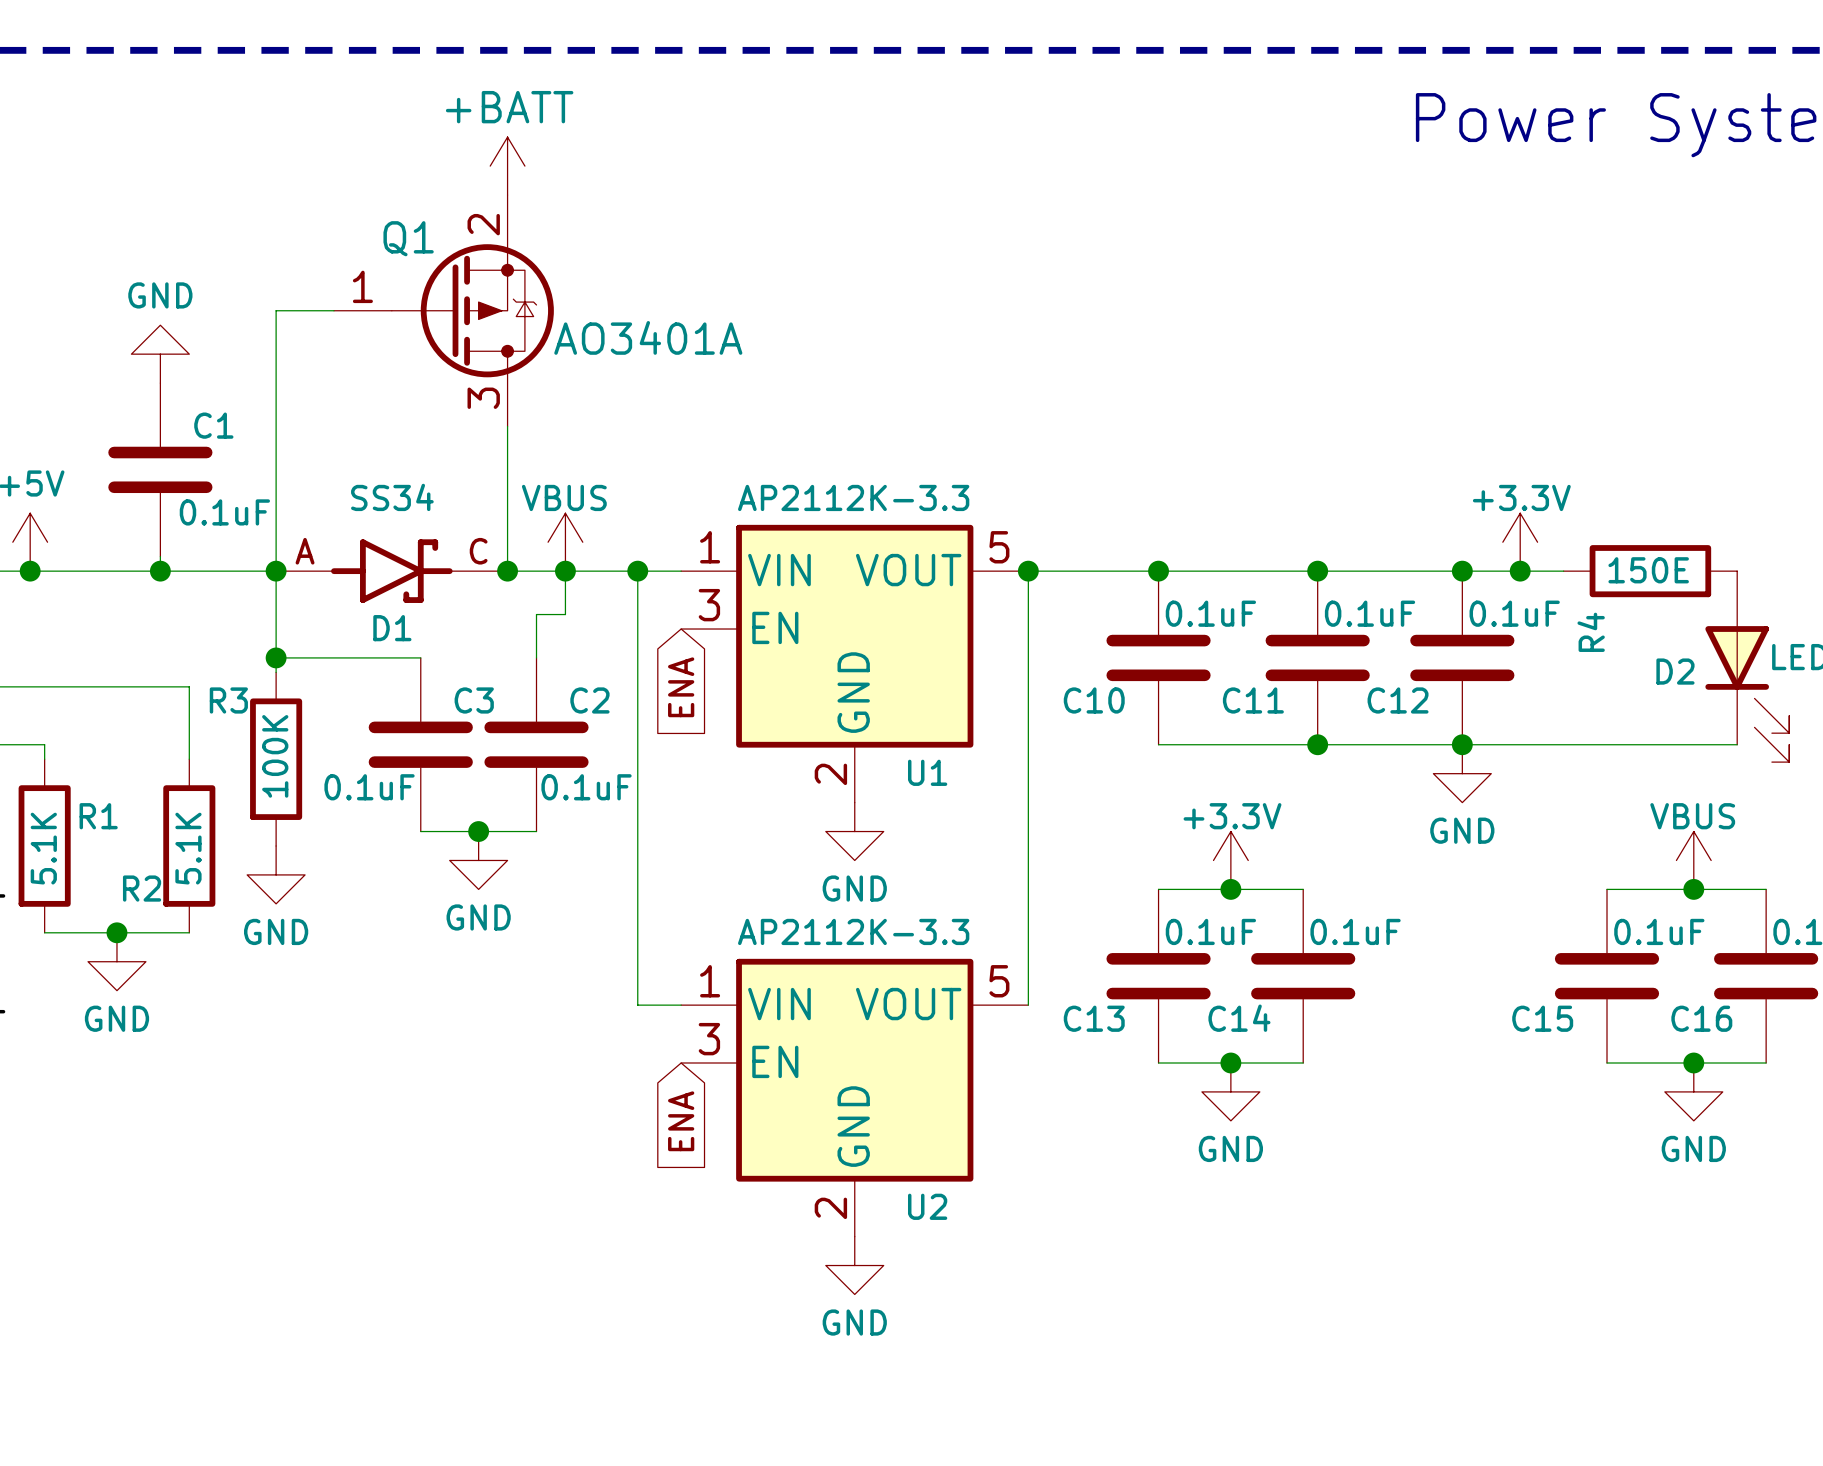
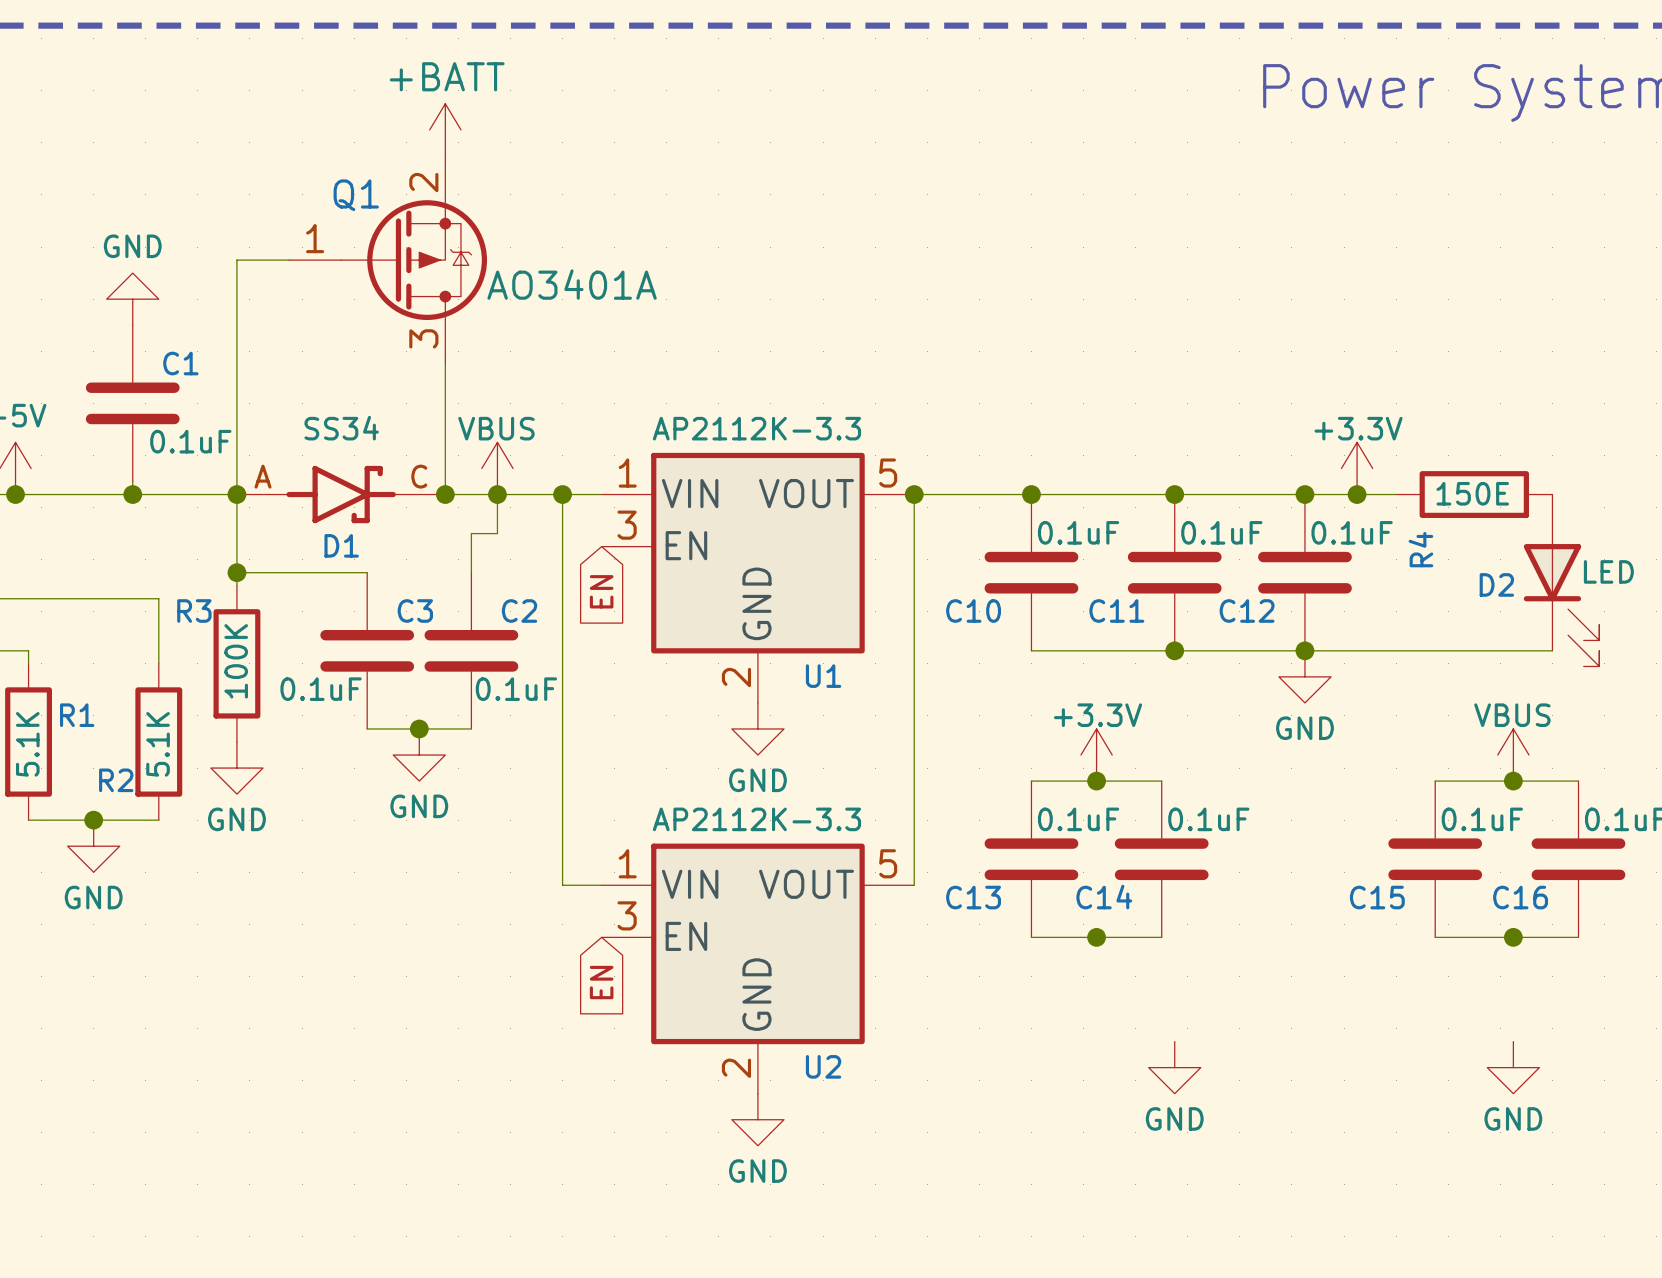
global label: ENA (681, 687) -> EN (601, 591)
power symbol position: GND (1230, 1091) -> GND (1174, 1067)
power symbol position: GND (1693, 1091) -> GND (1513, 1067)
global label: ENA (681, 1121) -> EN (601, 982)

